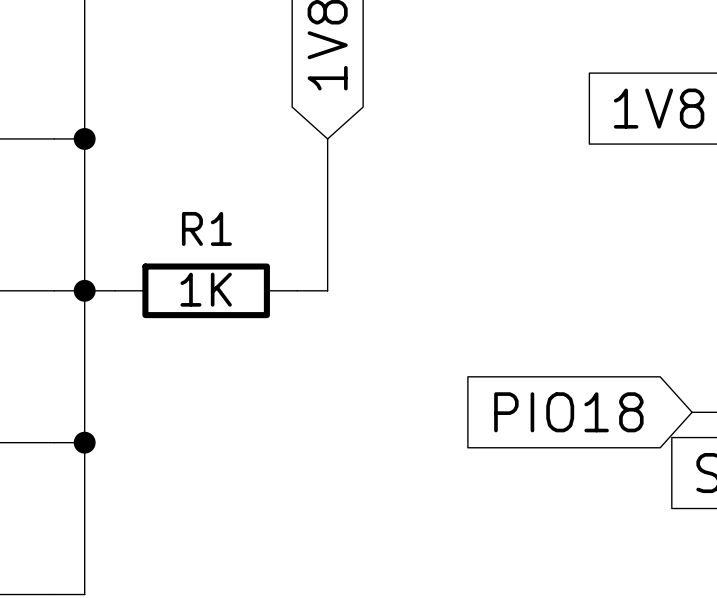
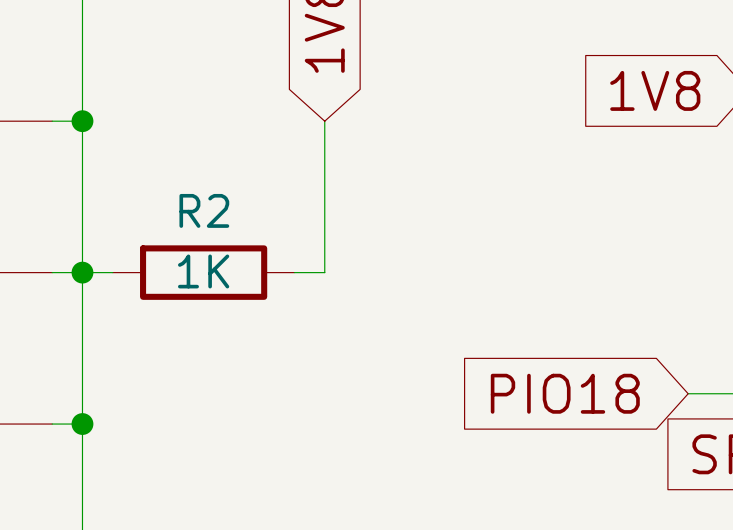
R1 name: R1 (206, 228) -> R2 (204, 210)

